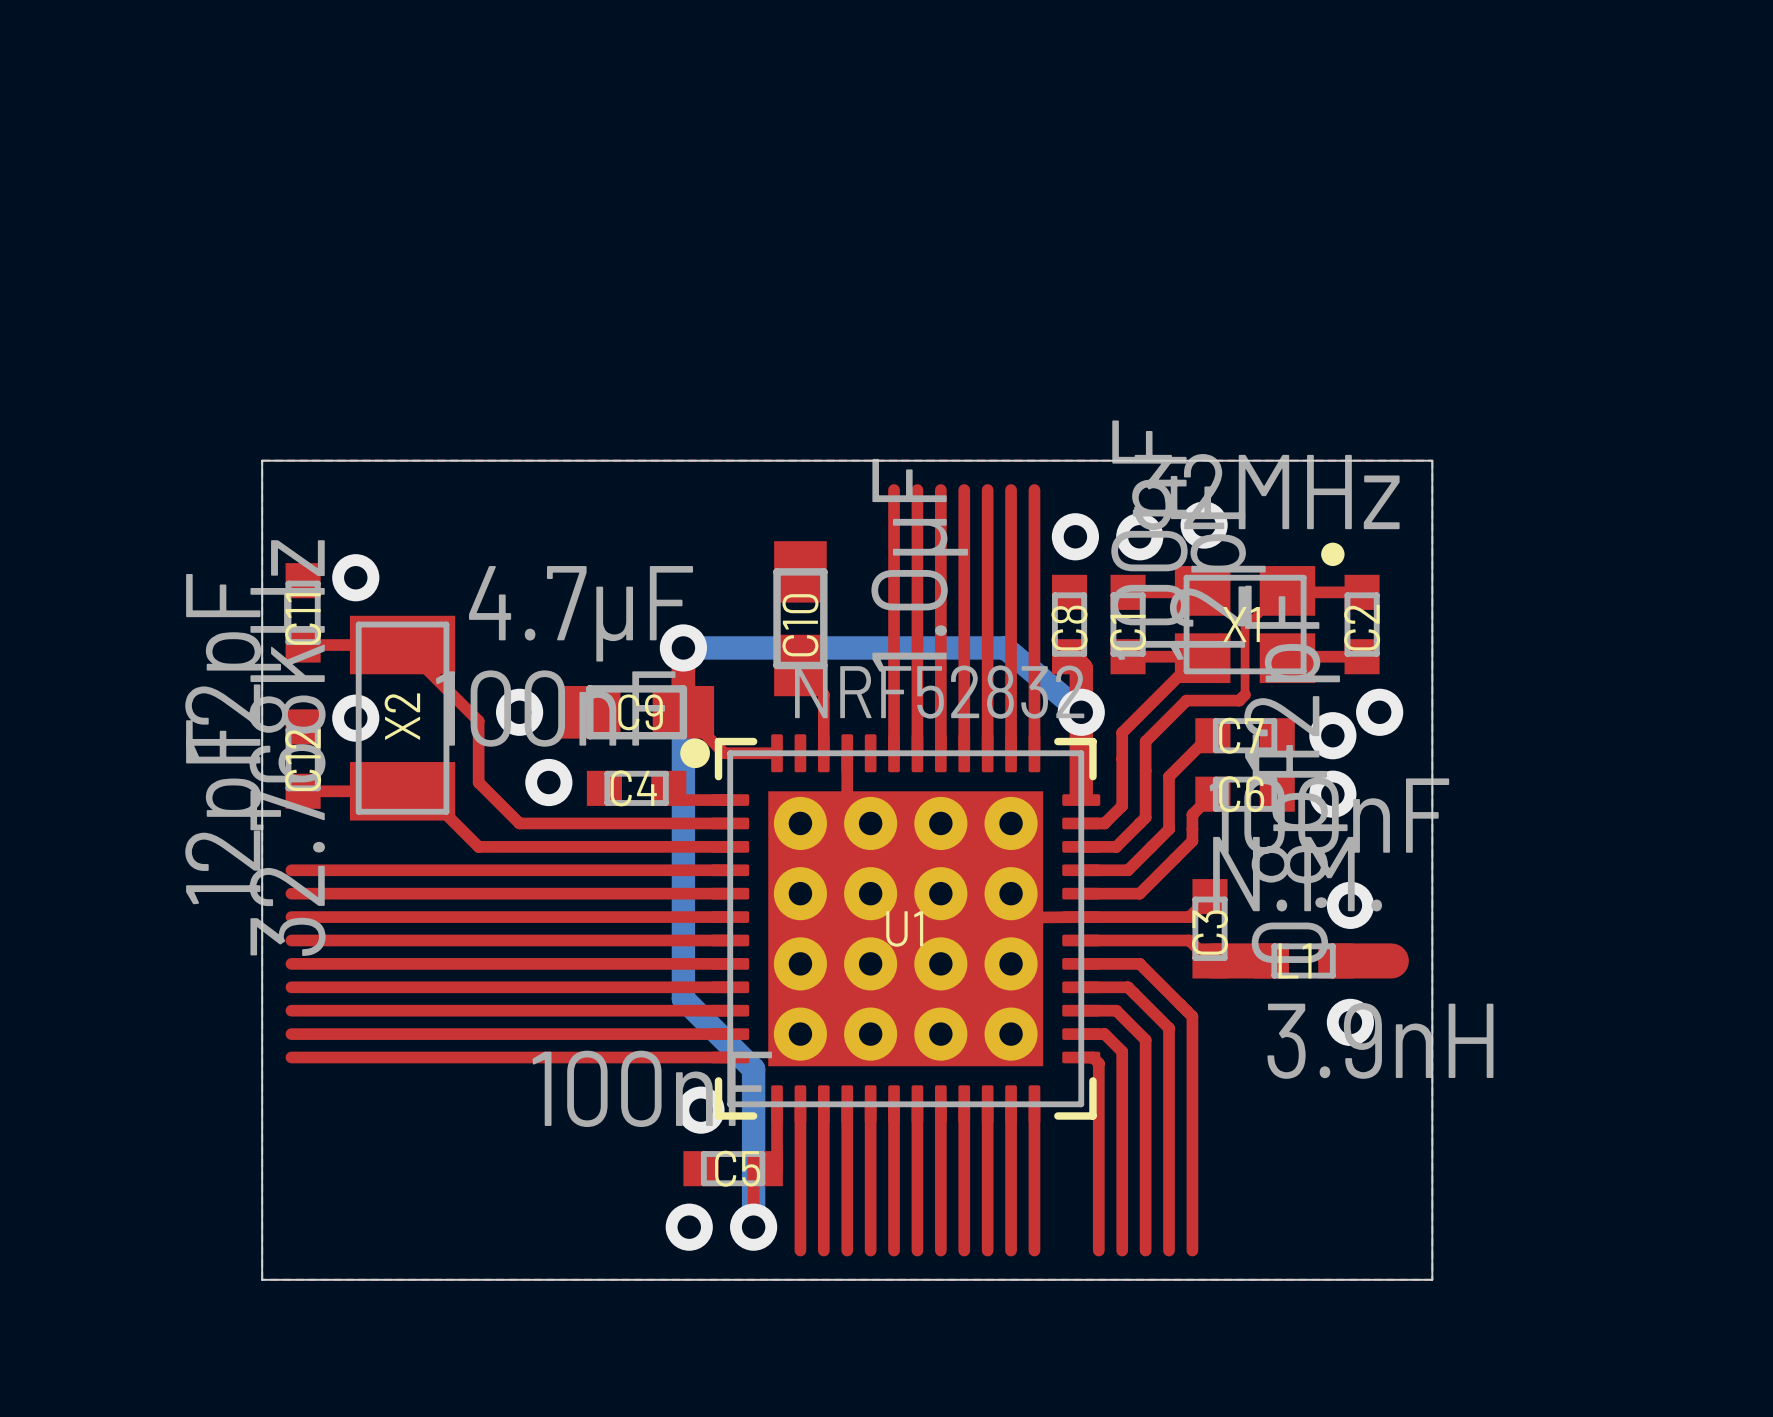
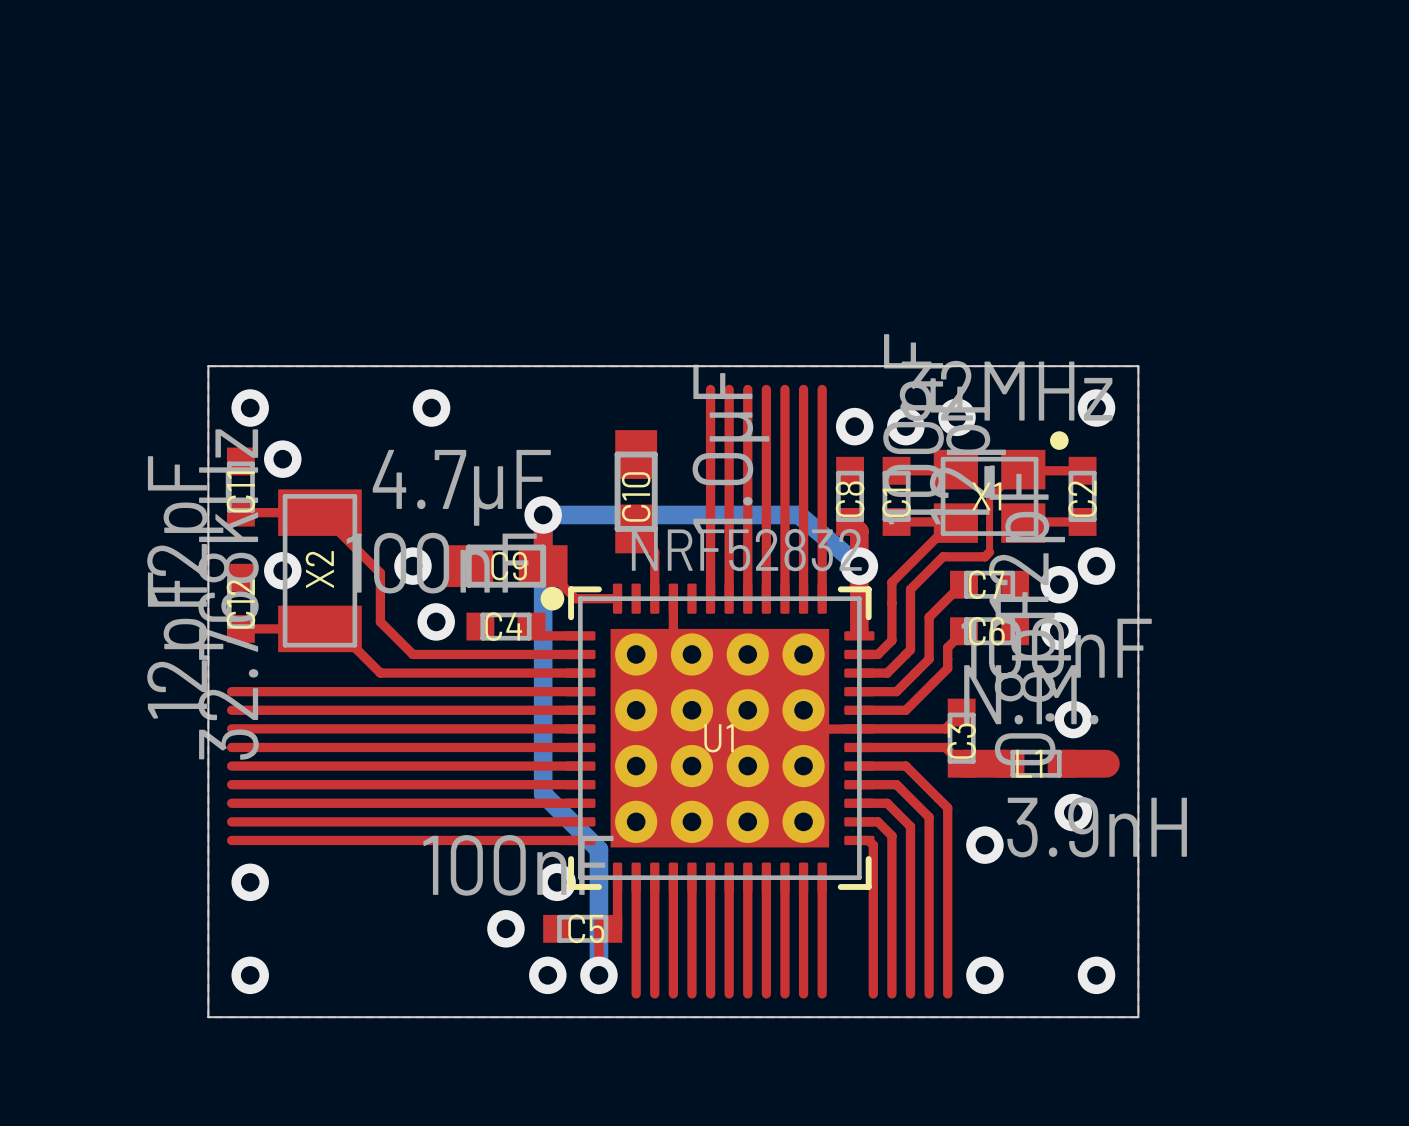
via: none -> (250, 408)
via: none -> (431, 408)
via: none -> (1096, 408)
via: none -> (984, 845)
via: none -> (250, 882)
via: none -> (505, 928)
via: none -> (250, 975)
via: none -> (984, 975)
via: none -> (1096, 975)

